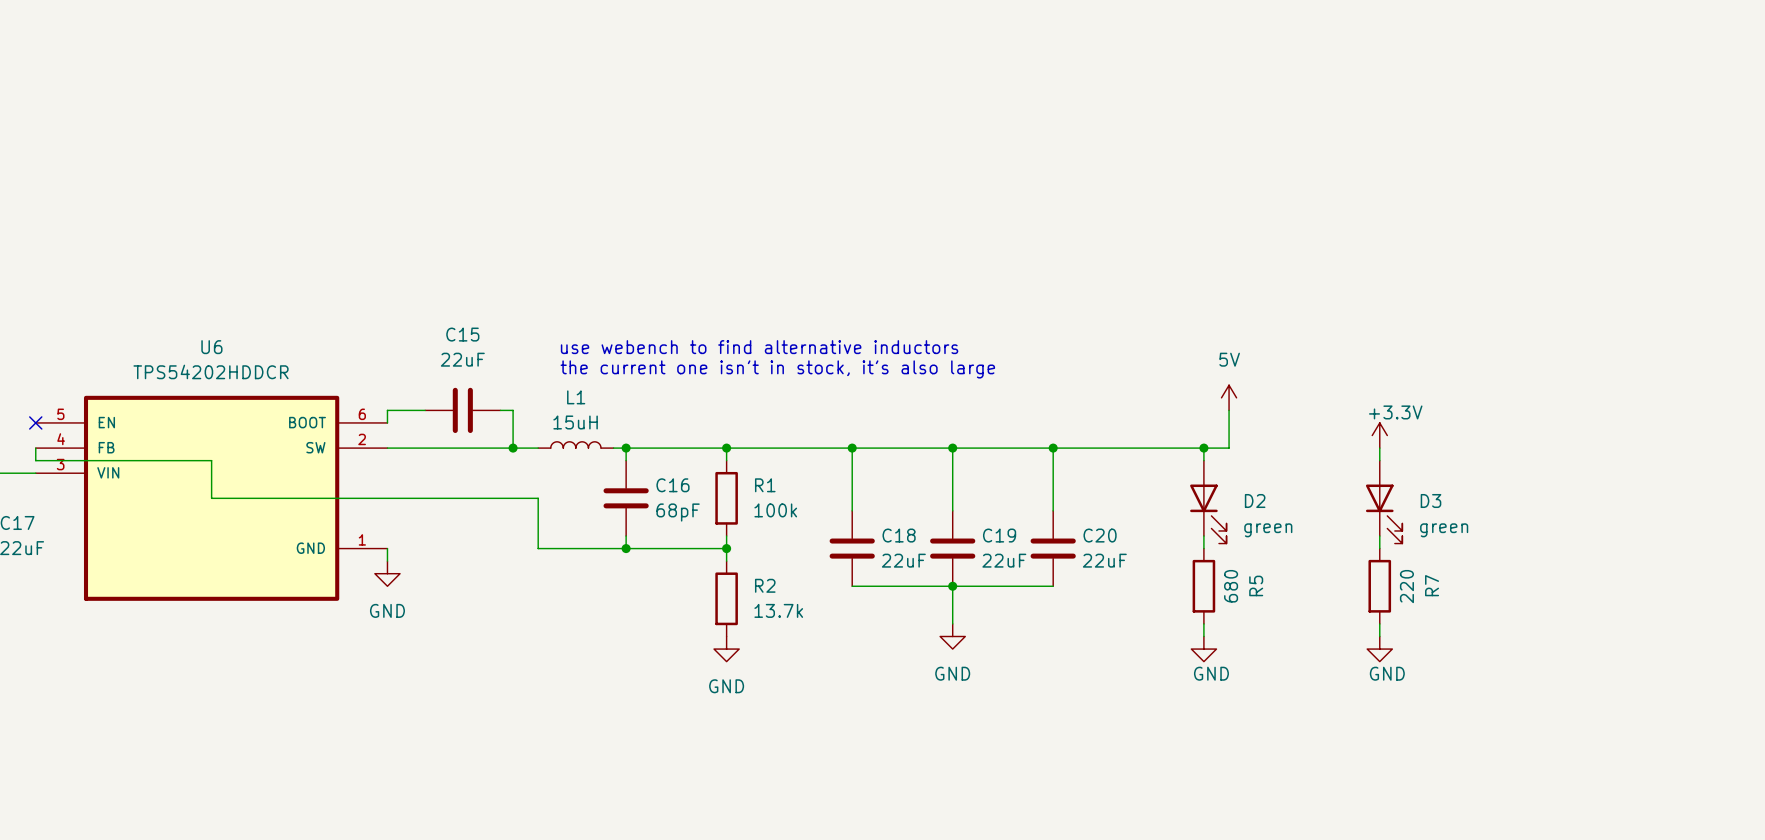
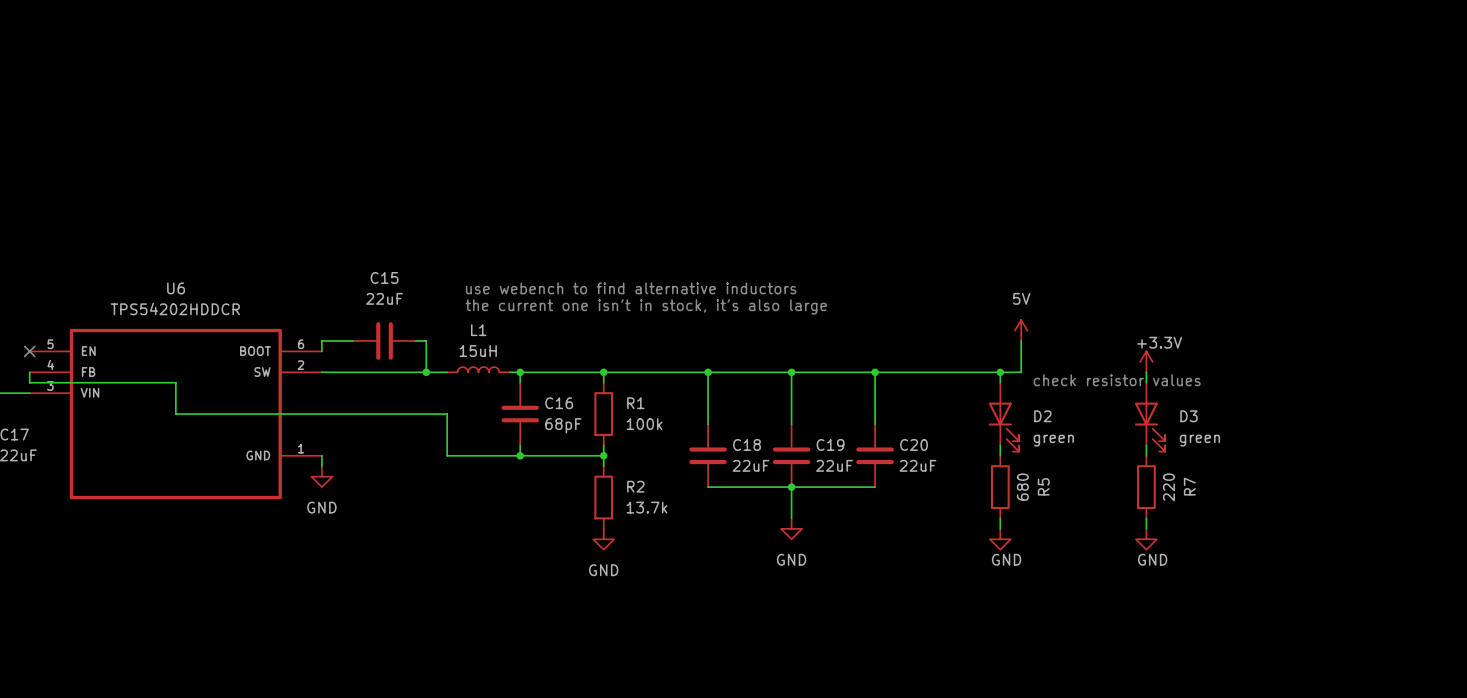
text: none -> check resistor values (1117, 380)

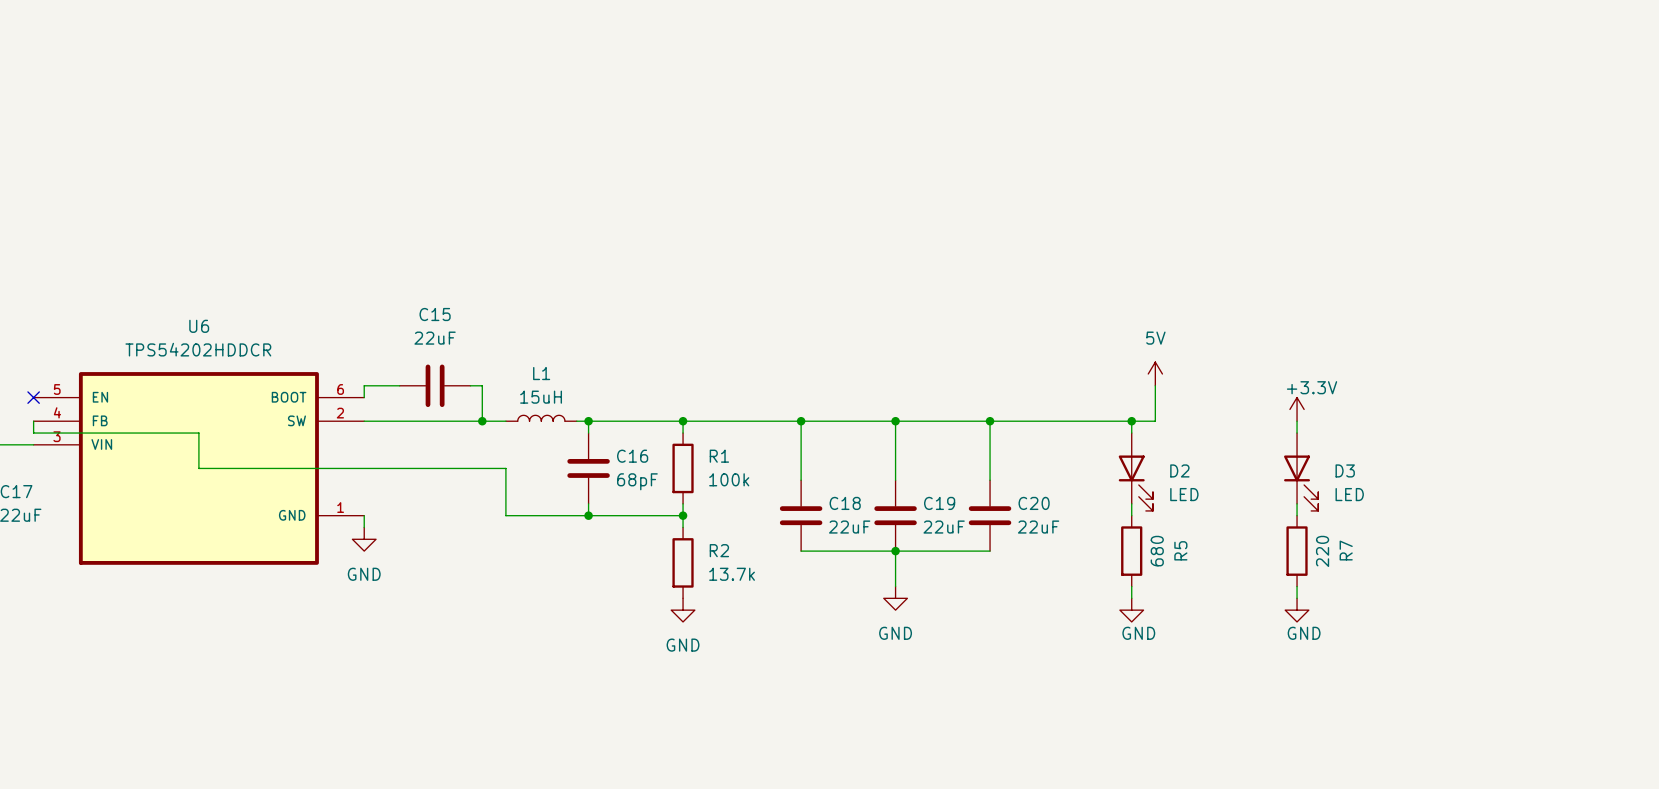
text: use webench to find alternative inductors (631, 288) -> none
text: the current one isn't in stock, it's also large (646, 306) -> none
text: check resistor values (1117, 380) -> none
D2 value: green (1053, 440) -> LED (1184, 494)
D3 value: green (1199, 440) -> LED (1349, 494)

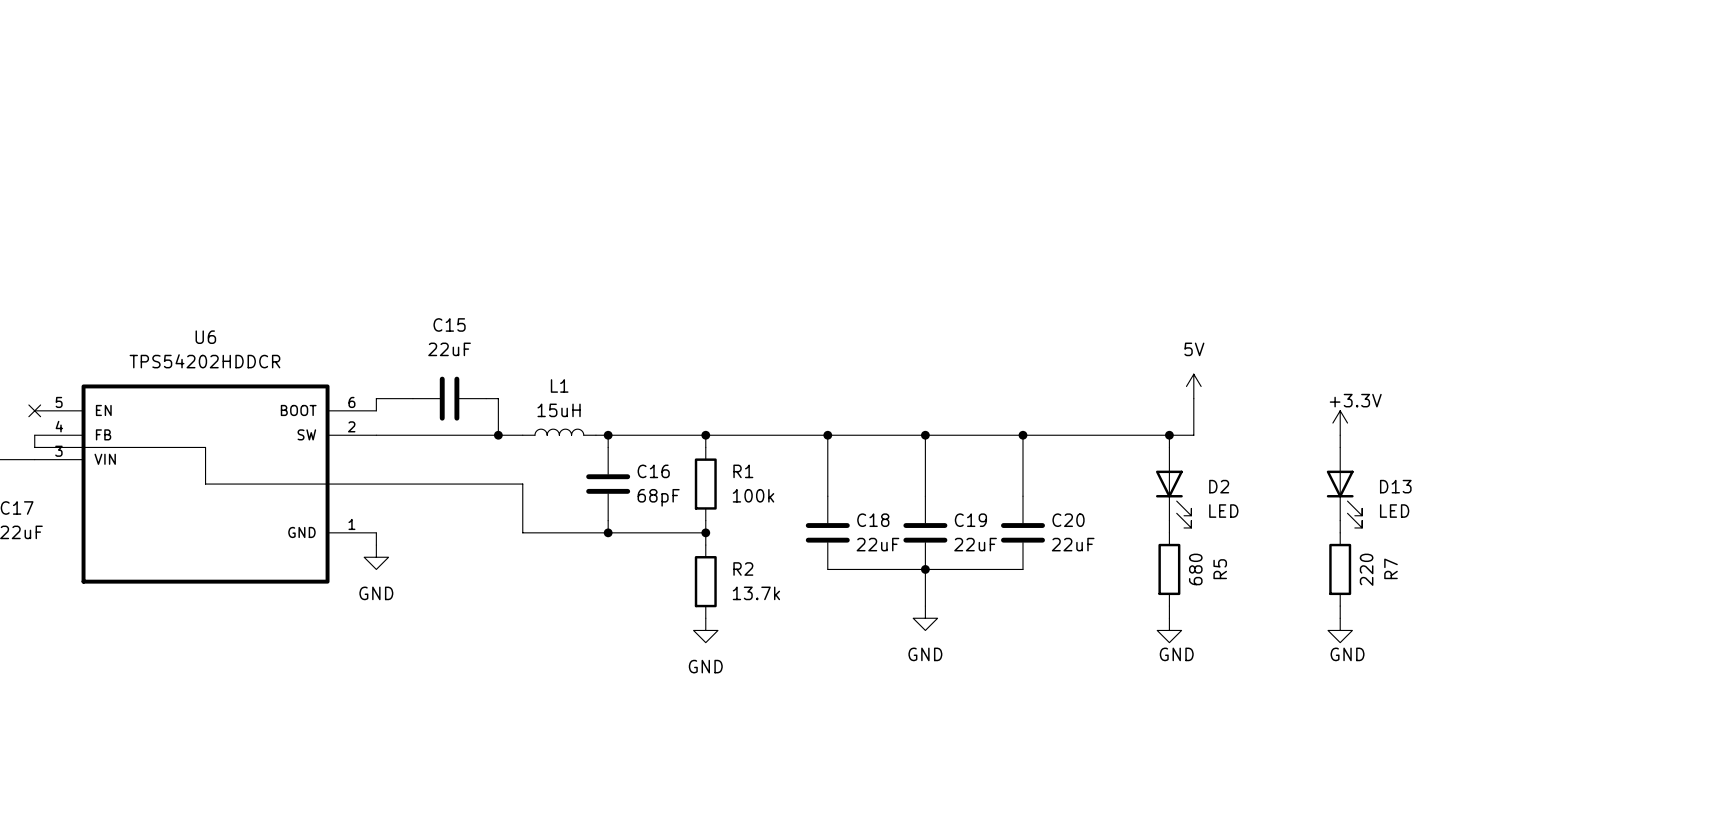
D3 name: D3 (1345, 470) -> D13 (1395, 486)

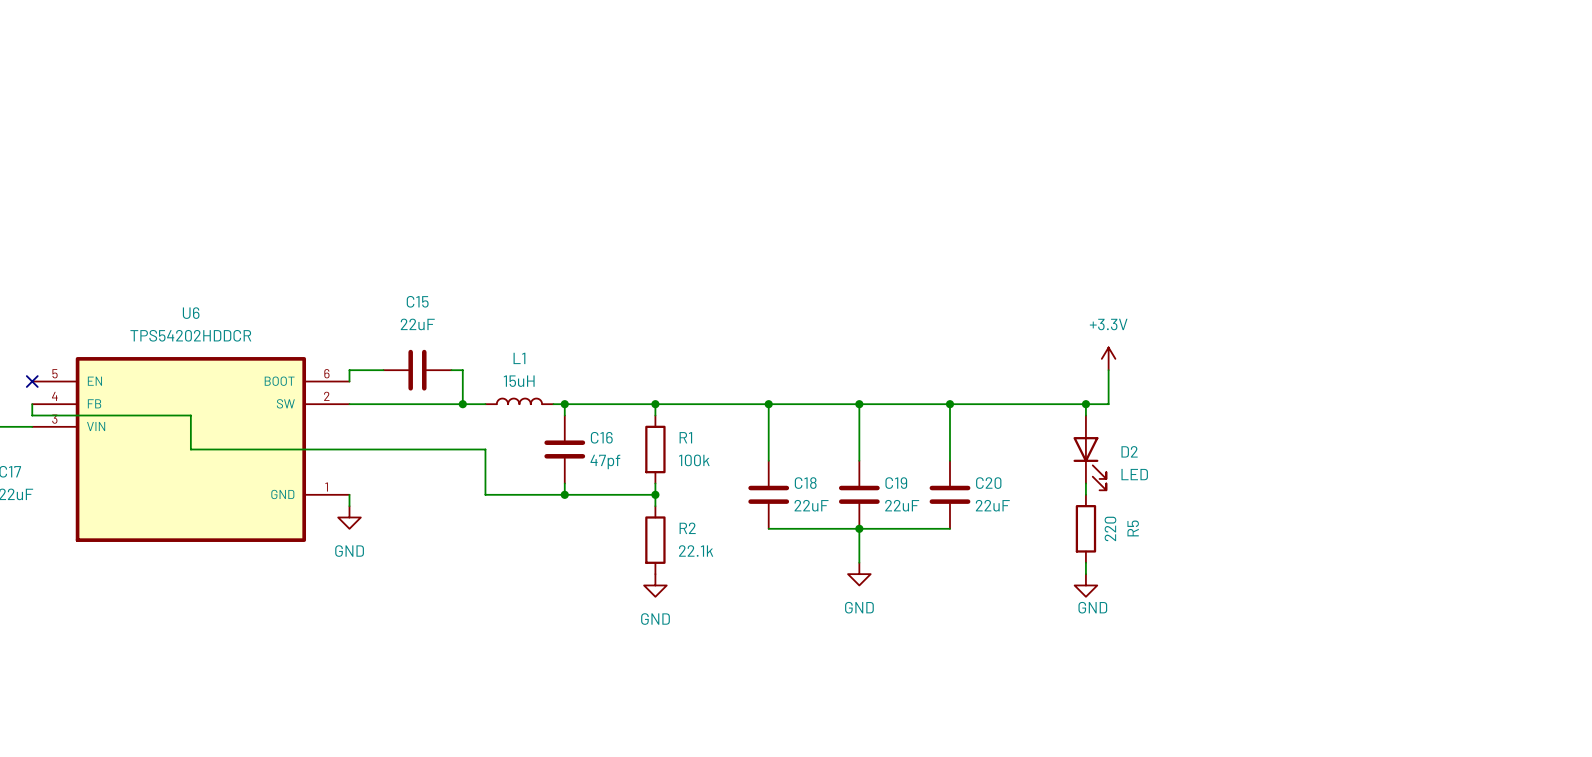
power symbol: 5V (1193, 386) -> +3.3V (1108, 358)
power symbol: +3.3V (1340, 423) -> none
wire: (1340, 435) (1340, 447) -> none
D13: LED (1344, 487) -> none
C16 value: 68pF (658, 497) -> 47pf (605, 461)
wire: (1340, 520) (1340, 532) -> none
R5 value: 680 (1195, 569) -> 220 (1110, 528)
R7: 220 (1340, 569) -> none
R2 value: 13.7k (756, 593) -> 22.1k (696, 551)
wire: (1340, 606) (1340, 618) -> none
power symbol: GND (1340, 630) -> none

